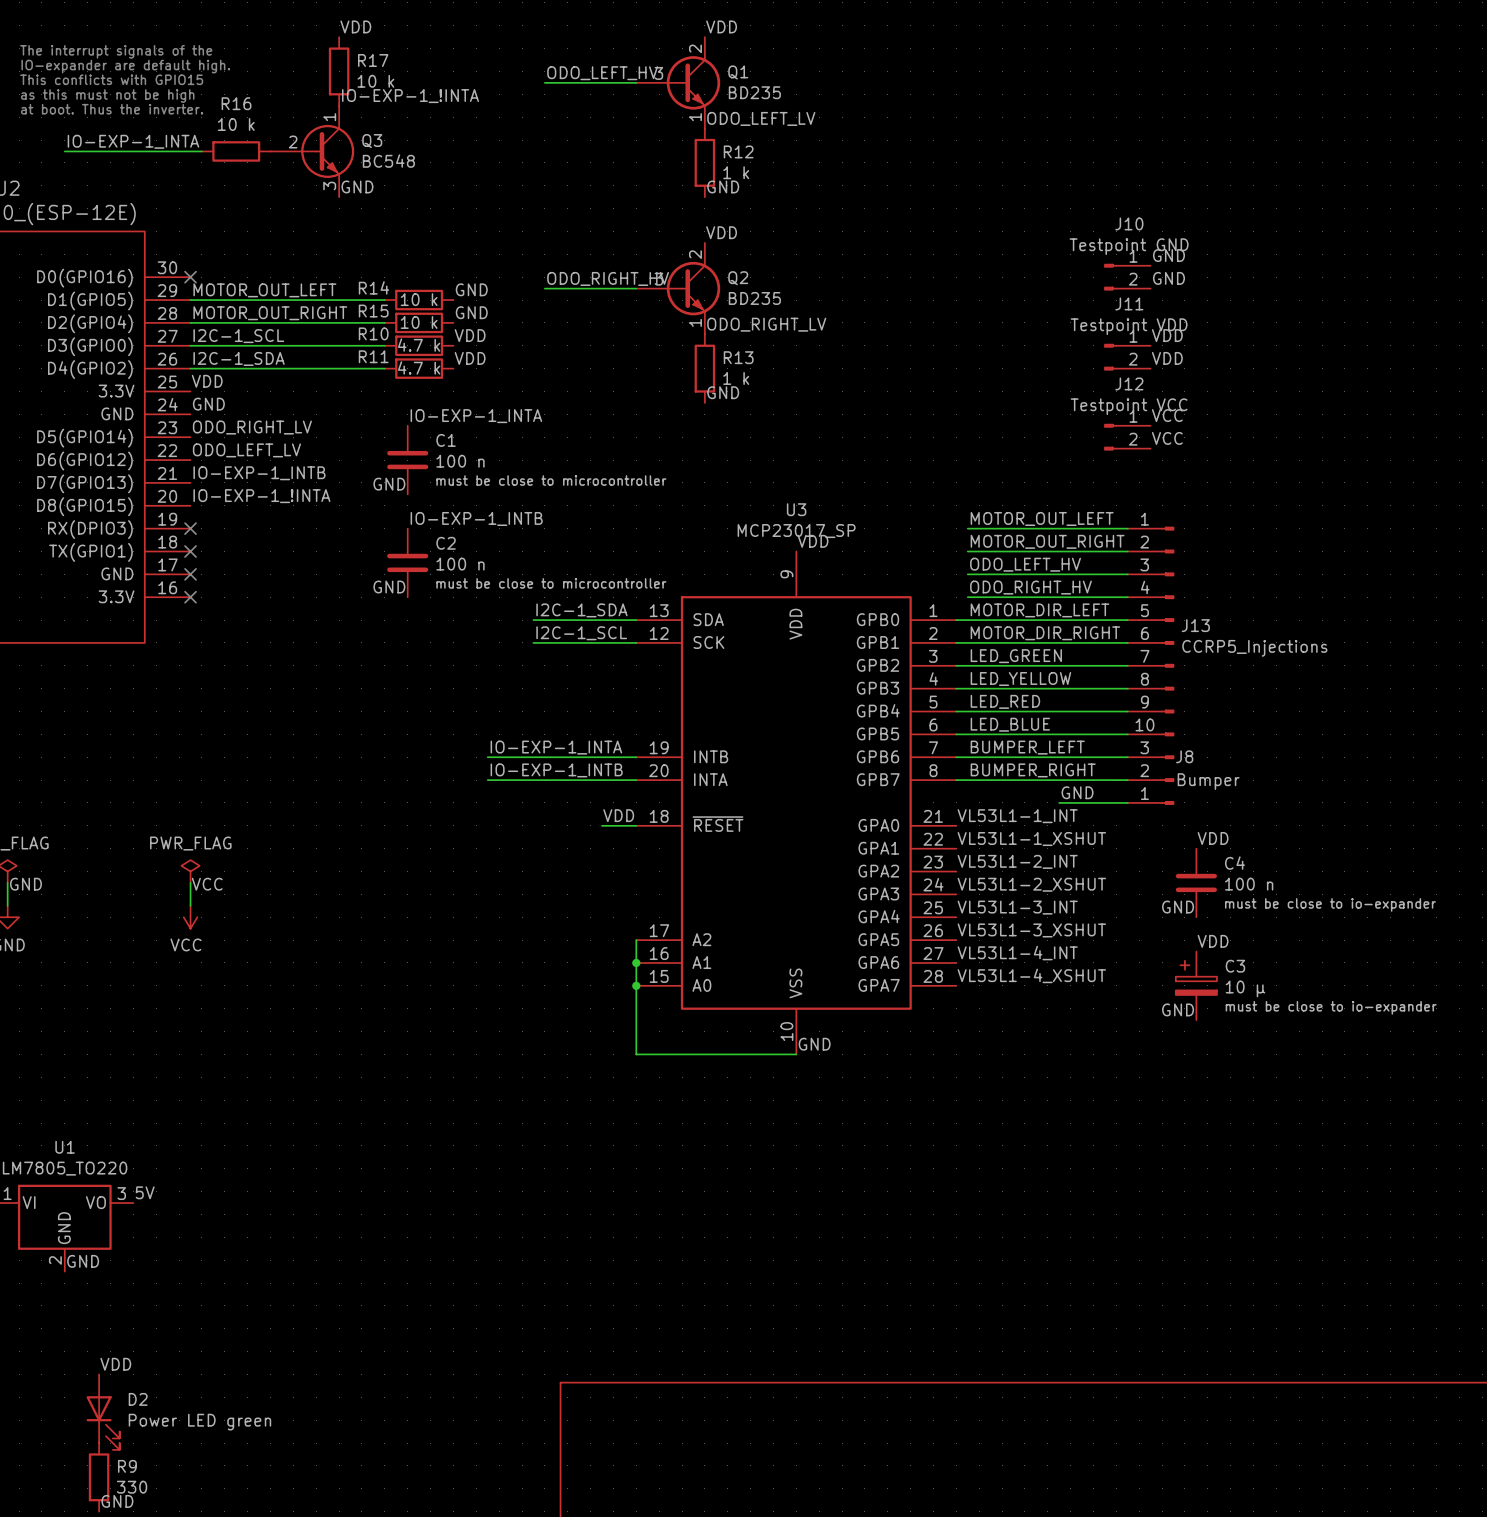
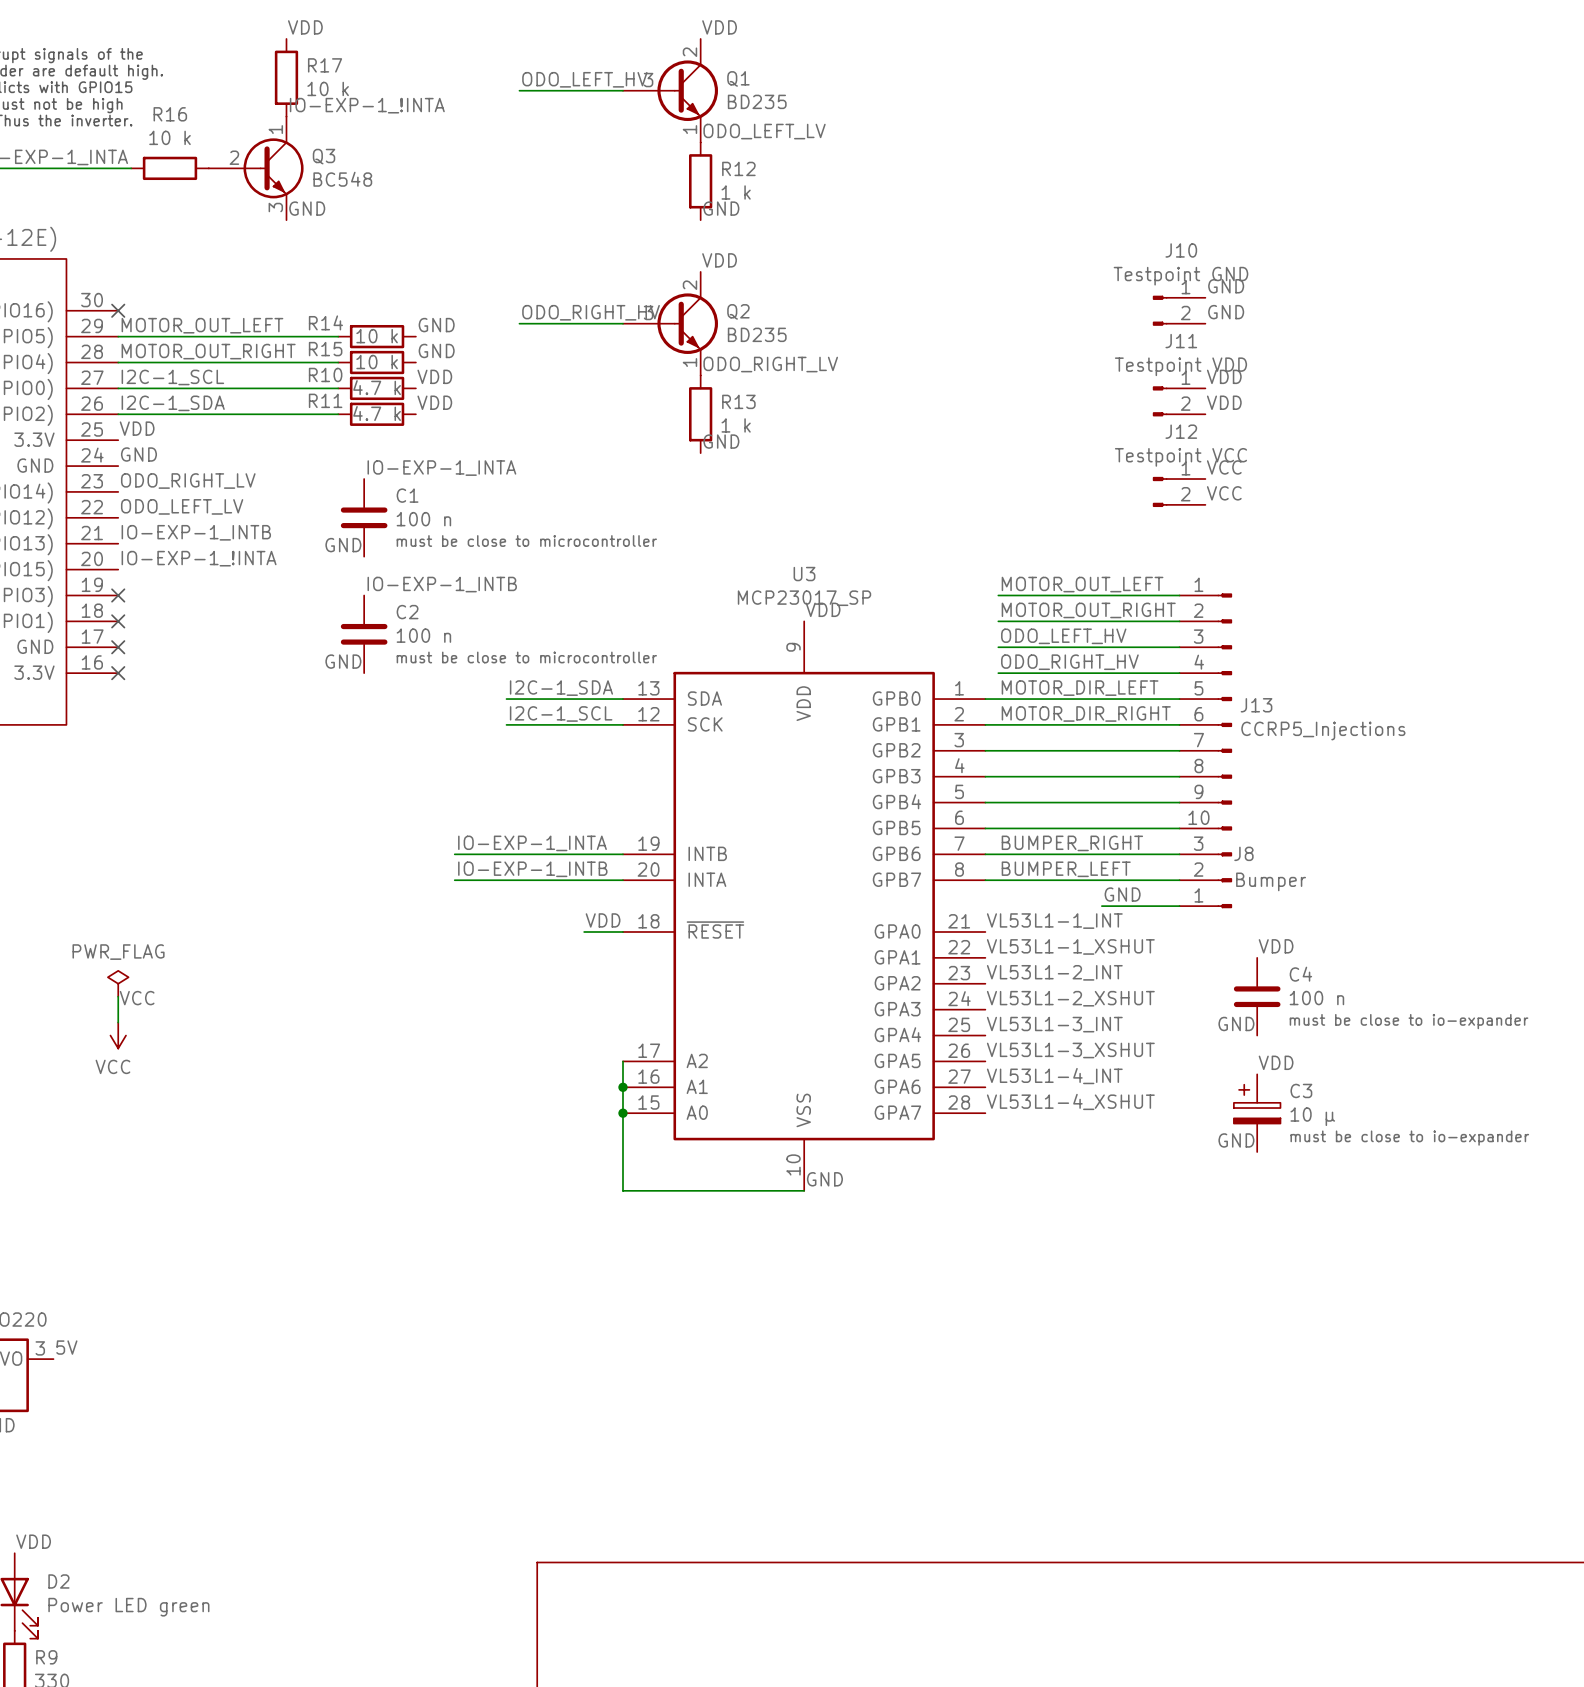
label: LED_GREEN (1016, 656) -> none
label: LED_YELLOW (1020, 679) -> none
label: LED_RED (1005, 701) -> none
label: LED_BLUE (1010, 724) -> none
label: BUMPER_LEFT (1027, 747) -> BUMPER_RIGHT (1072, 843)
label: BUMPER_RIGHT (1033, 770) -> BUMPER_LEFT (1066, 869)

